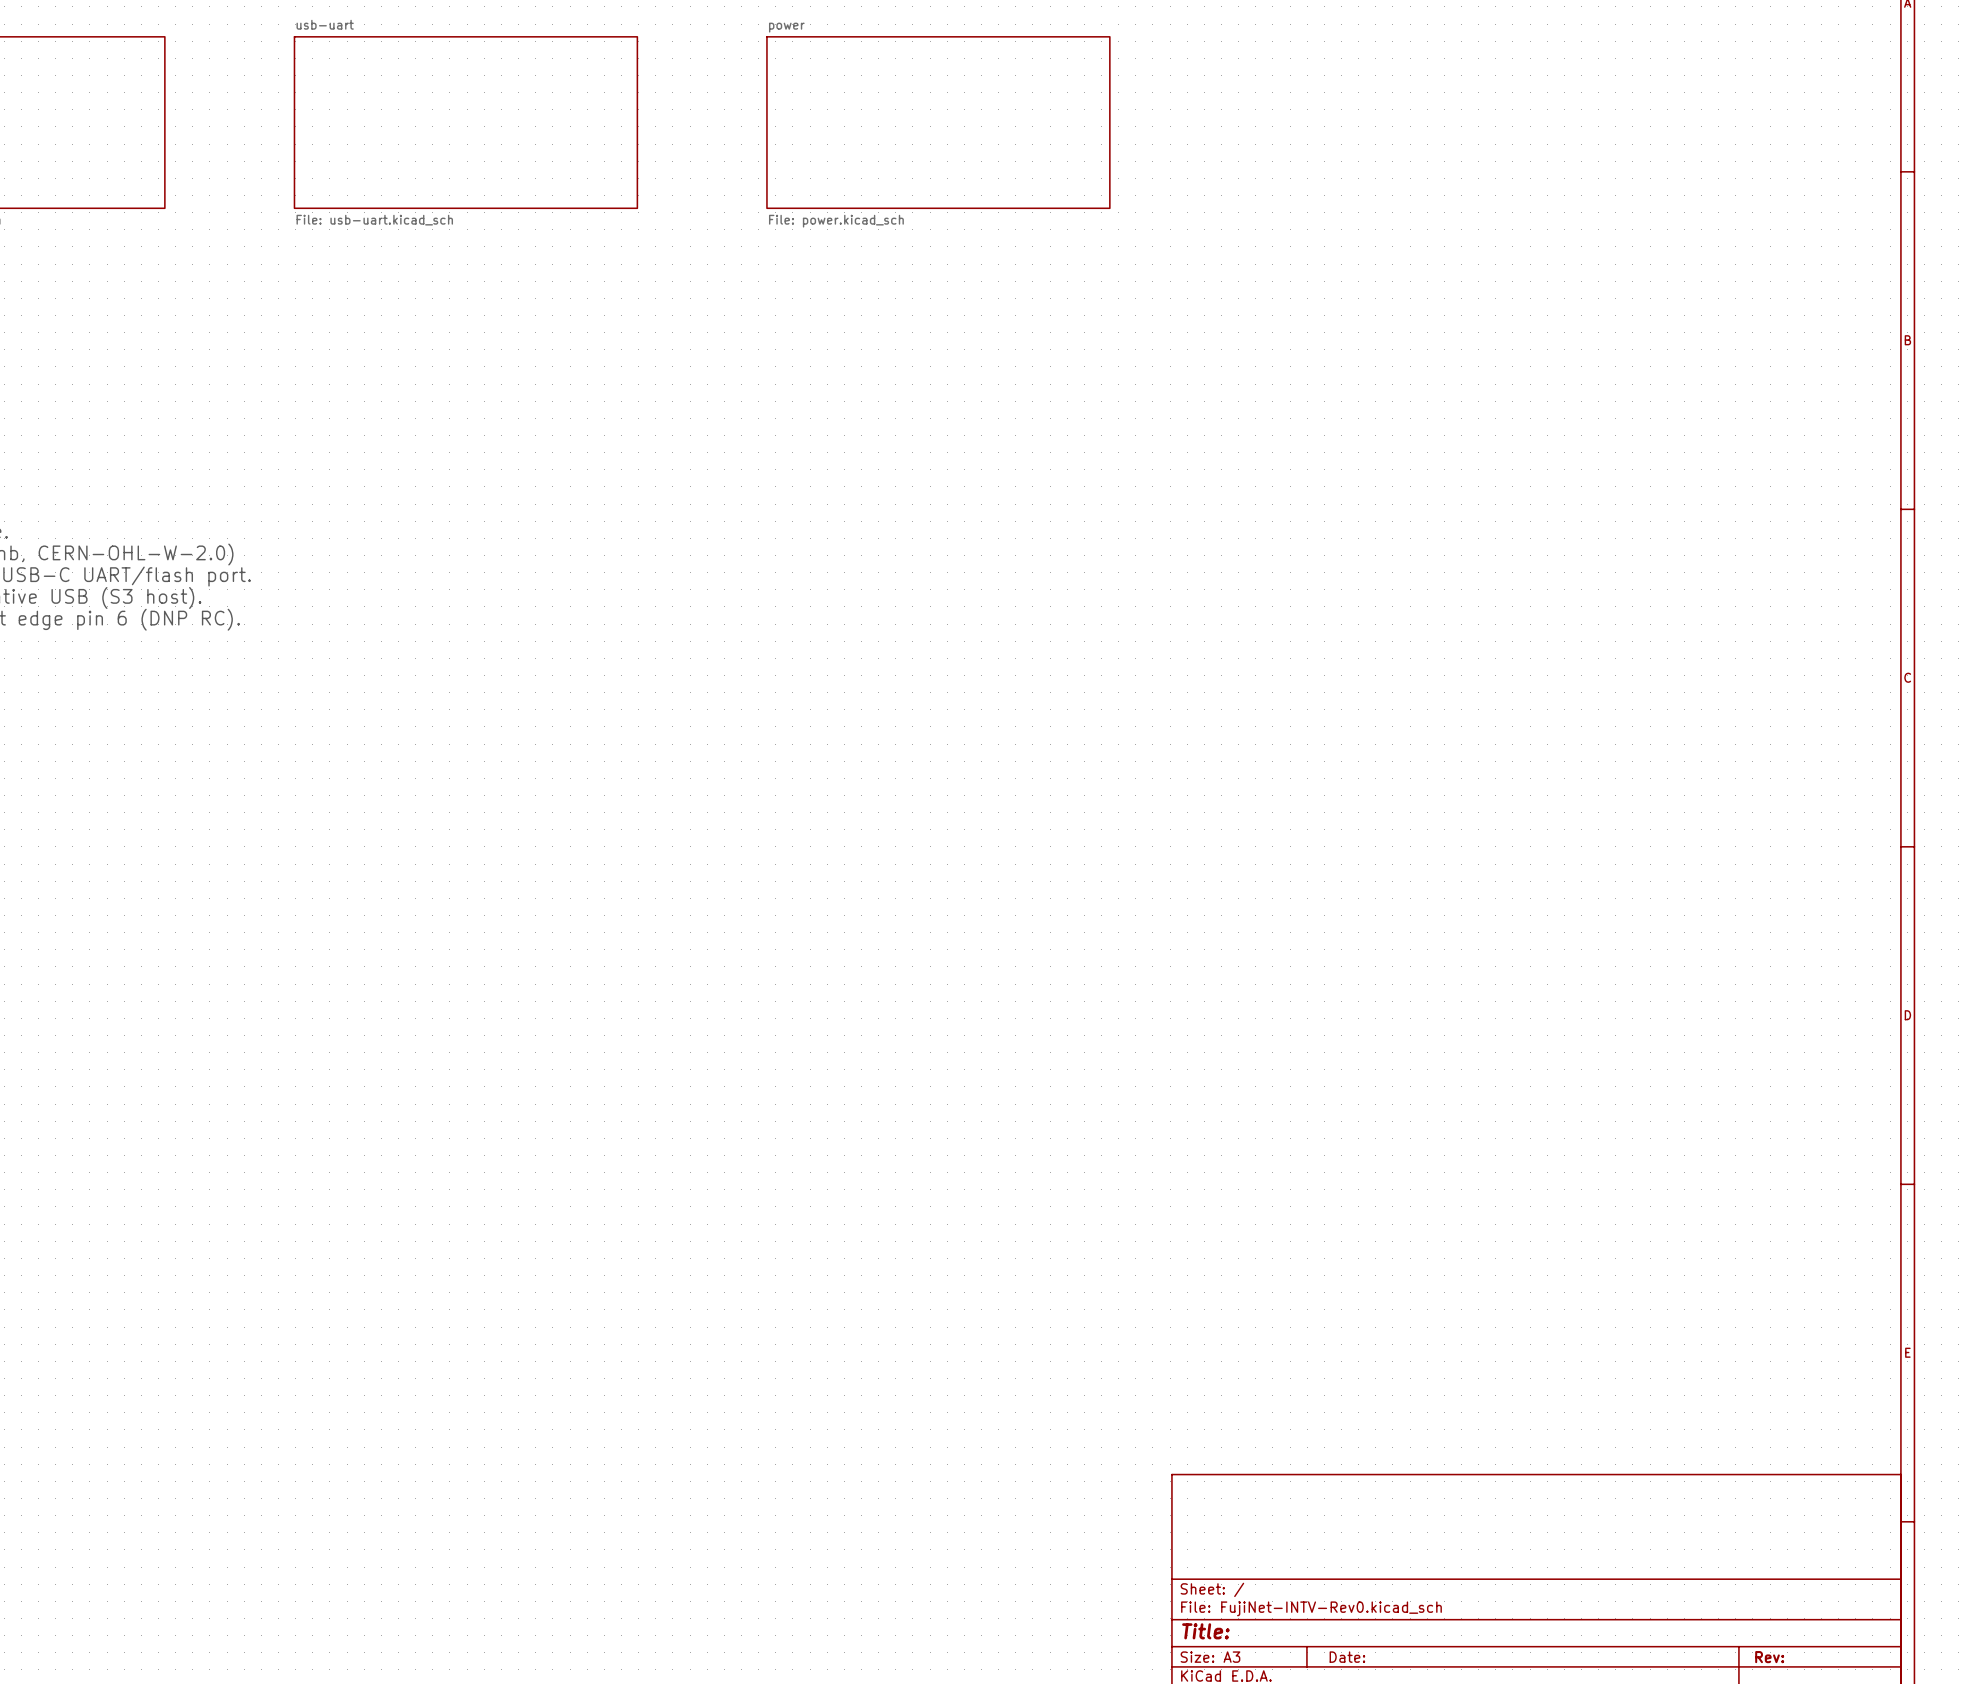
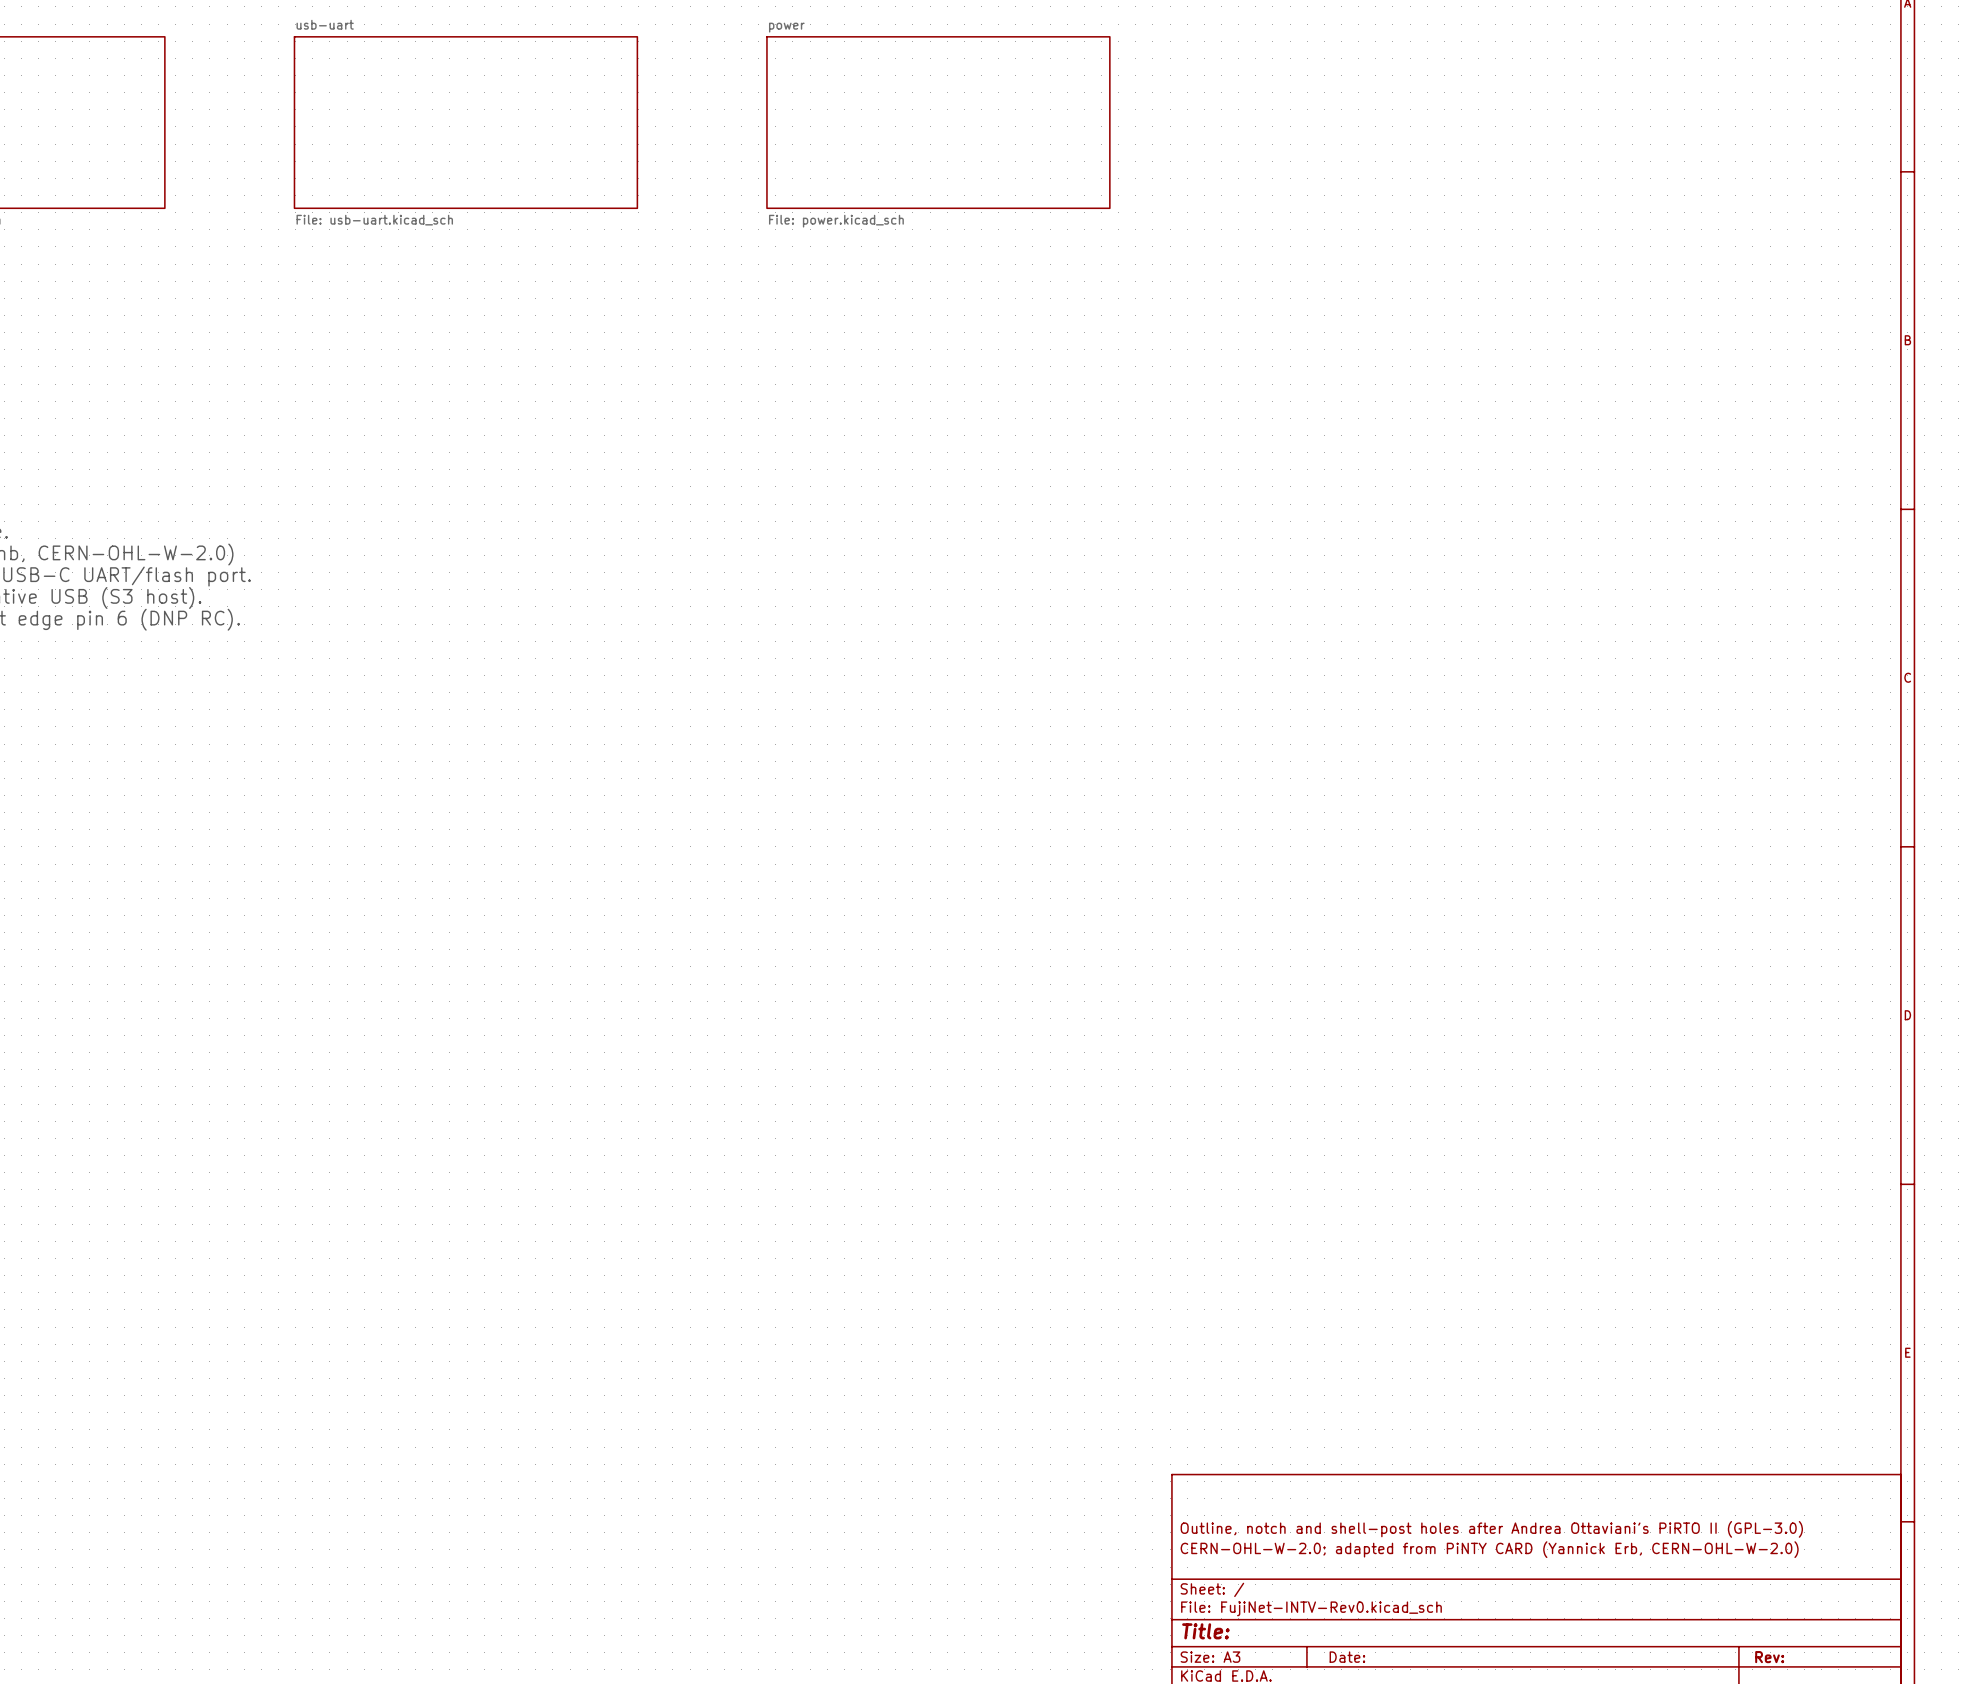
title block: none -> Outline, notch and shell-post holes after Andrea Ottaviani's PiRTO II (GPL-3.0) (1491, 1529)
title block: none -> CERN-OHL-W-2.0; adapted from PiNTY CARD (Yannick Erb, CERN-OHL-W-2.0) (1489, 1549)

